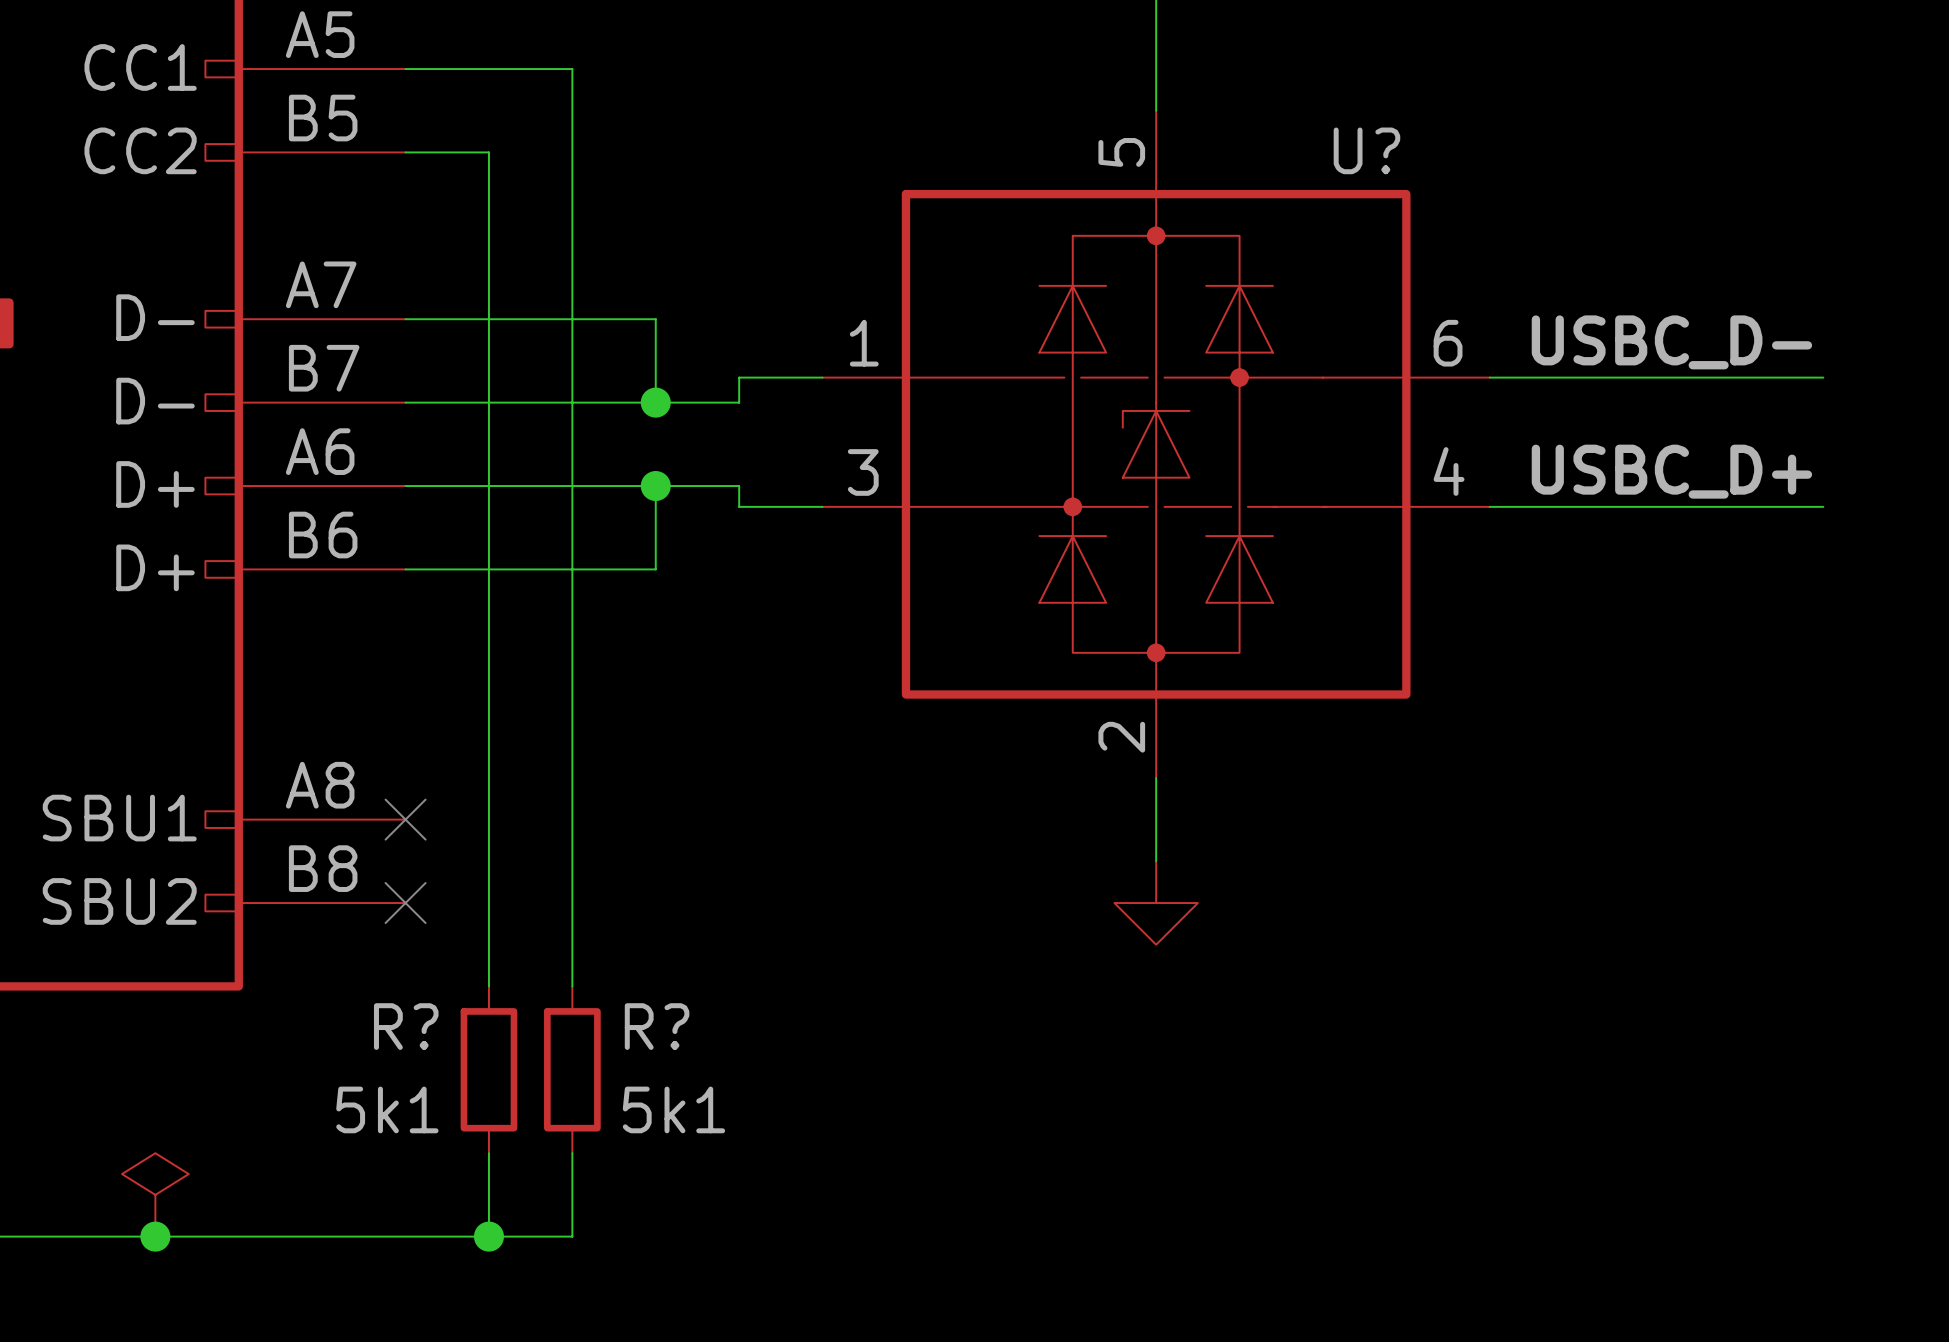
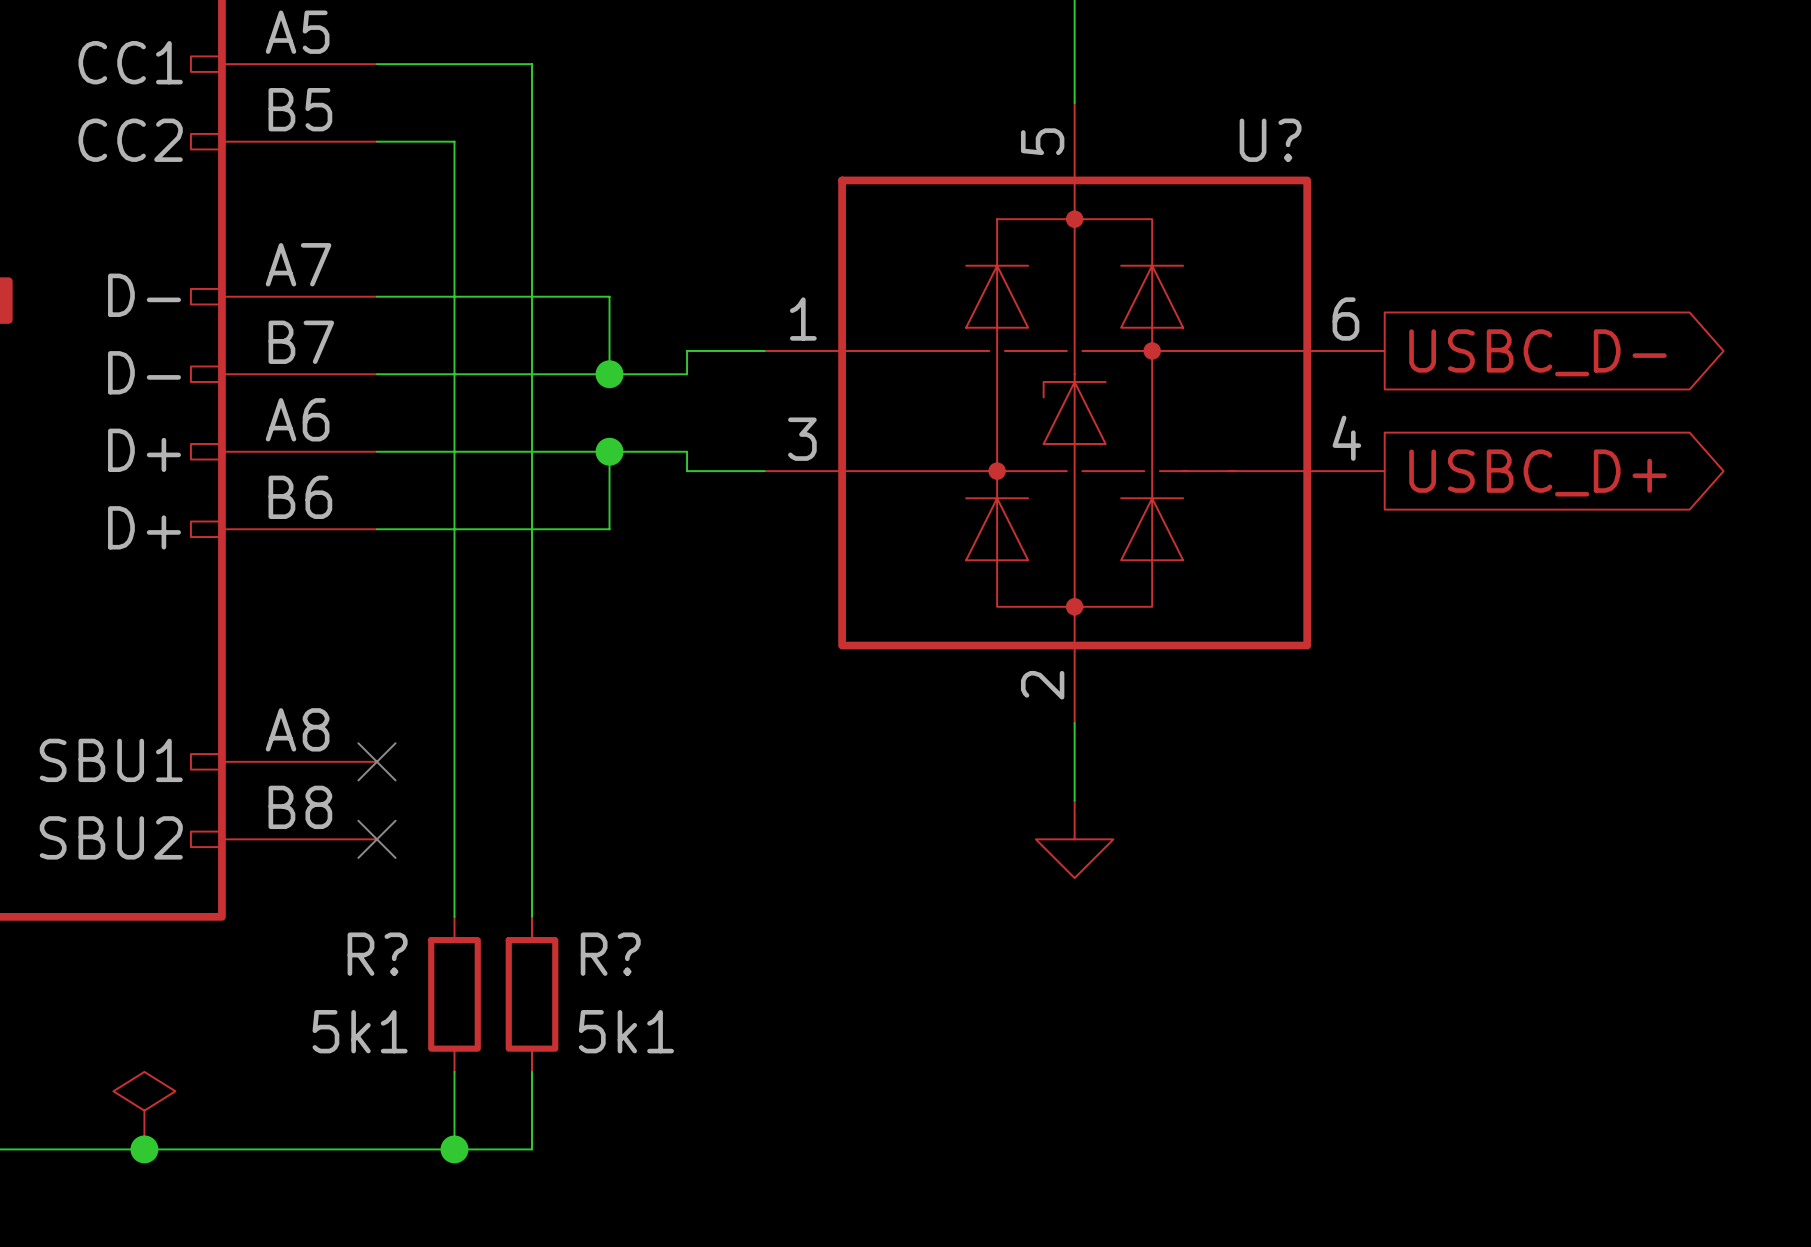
label: USBC_D- (1671, 342) -> none
wire: (1489, 377) (1823, 377) -> none
global label: none -> USBC_D- (1537, 352)
label: USBC_D+ (1671, 471) -> none
wire: (1489, 506) (1823, 506) -> none
global label: none -> USBC_D+ (1537, 472)

